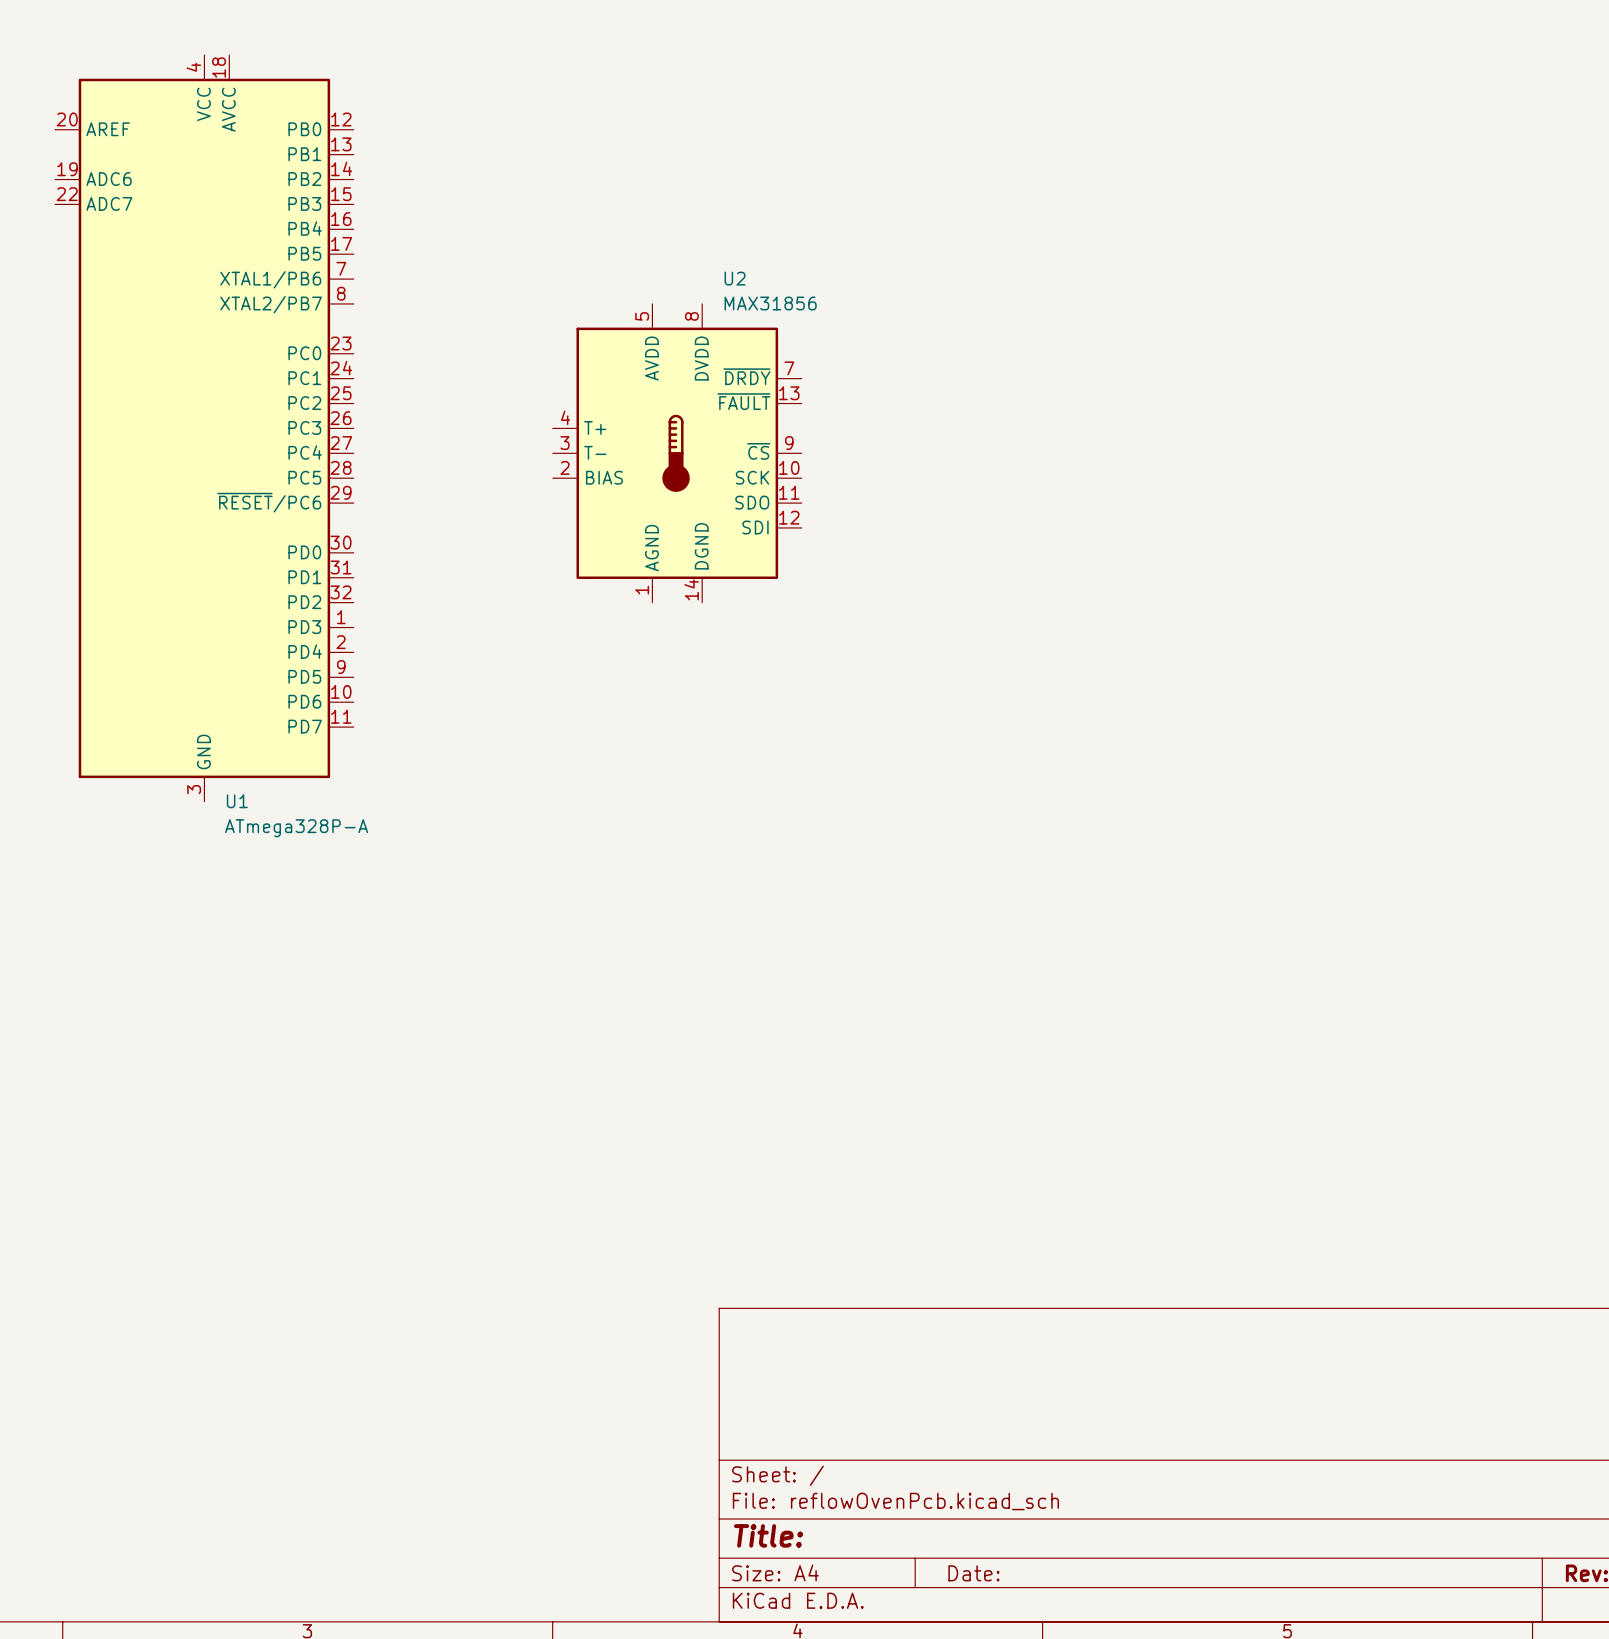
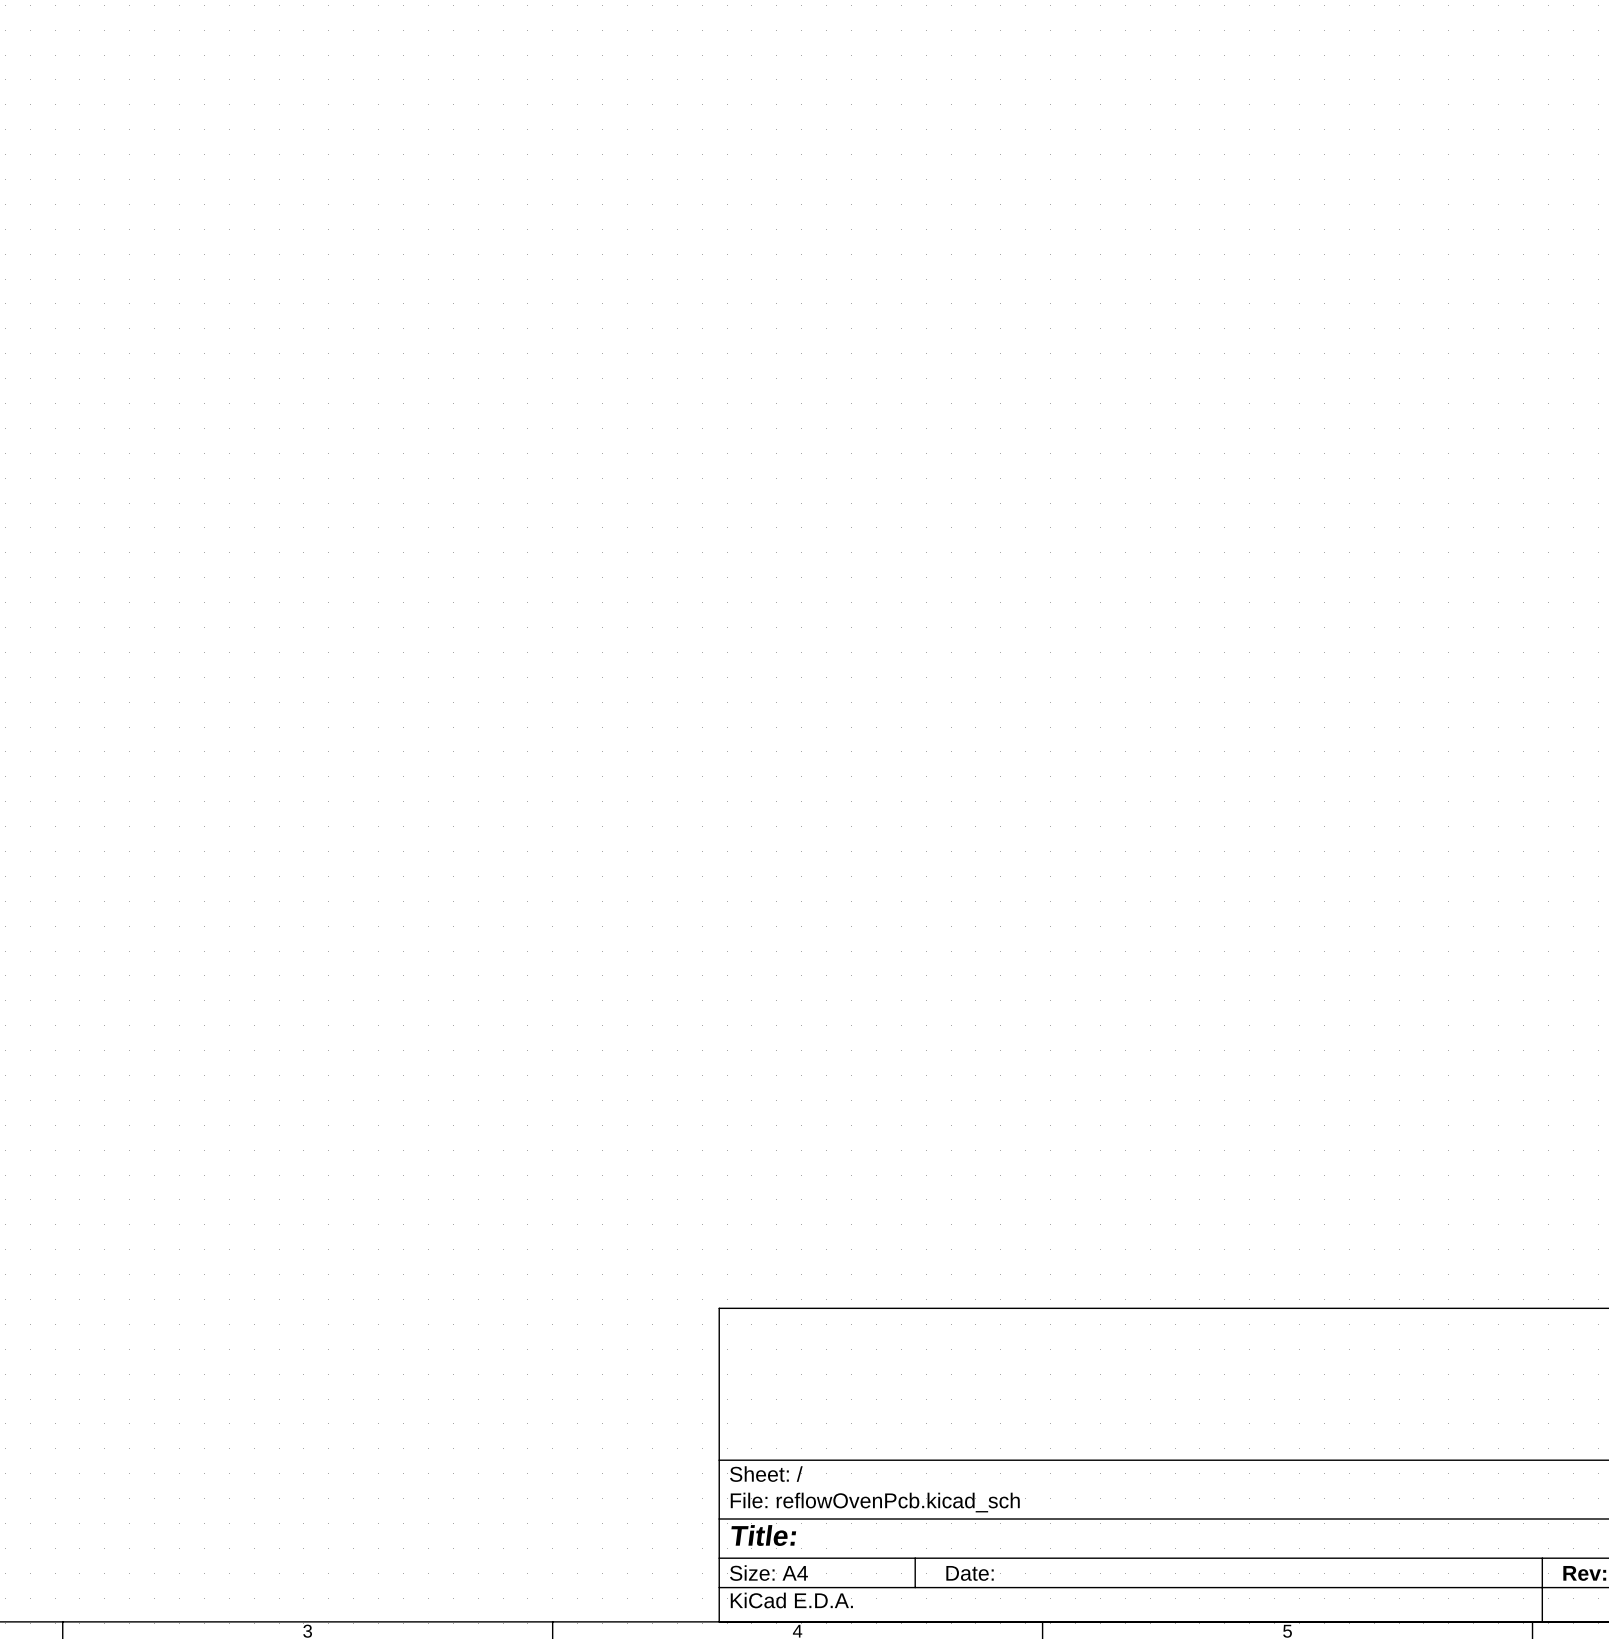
U1: ATmega328P-A (204, 428) -> none
U2: MAX31856 (677, 453) -> none

